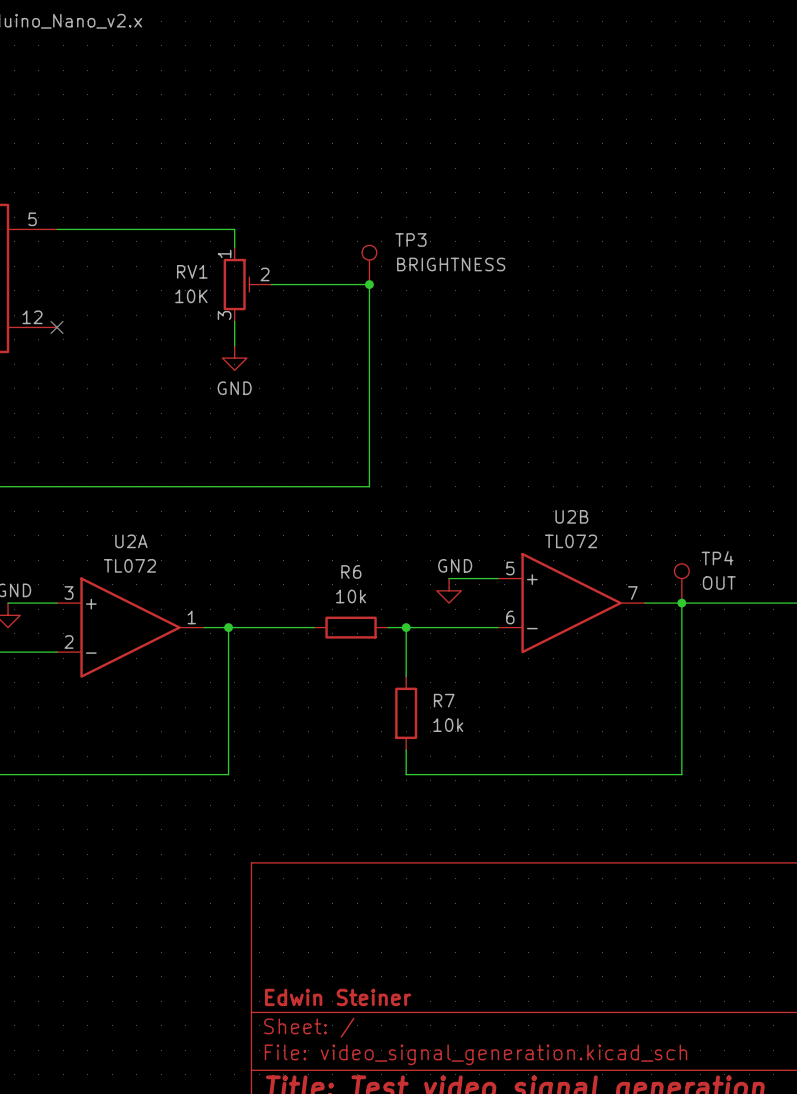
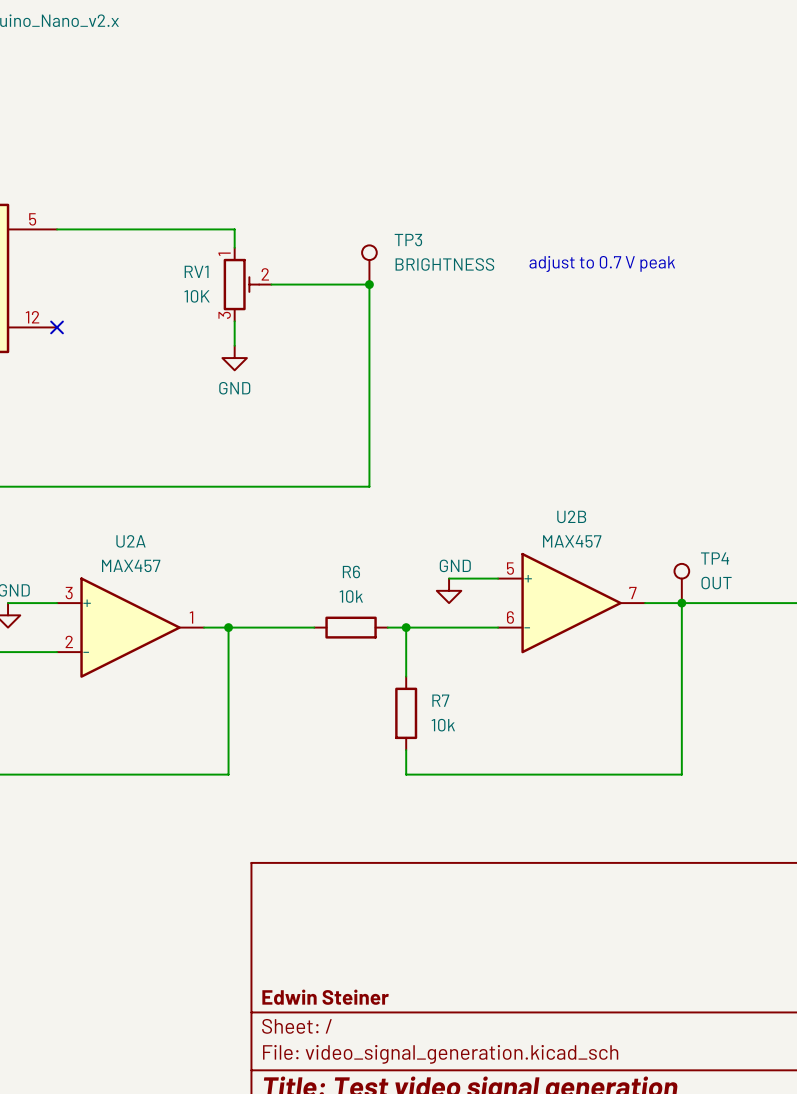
text: none -> adjust to 0.7 V peak (602, 264)
U2B value: TL072 (570, 541) -> MAX457 (572, 541)
U2A value: TL072 (129, 565) -> MAX457 (131, 565)

